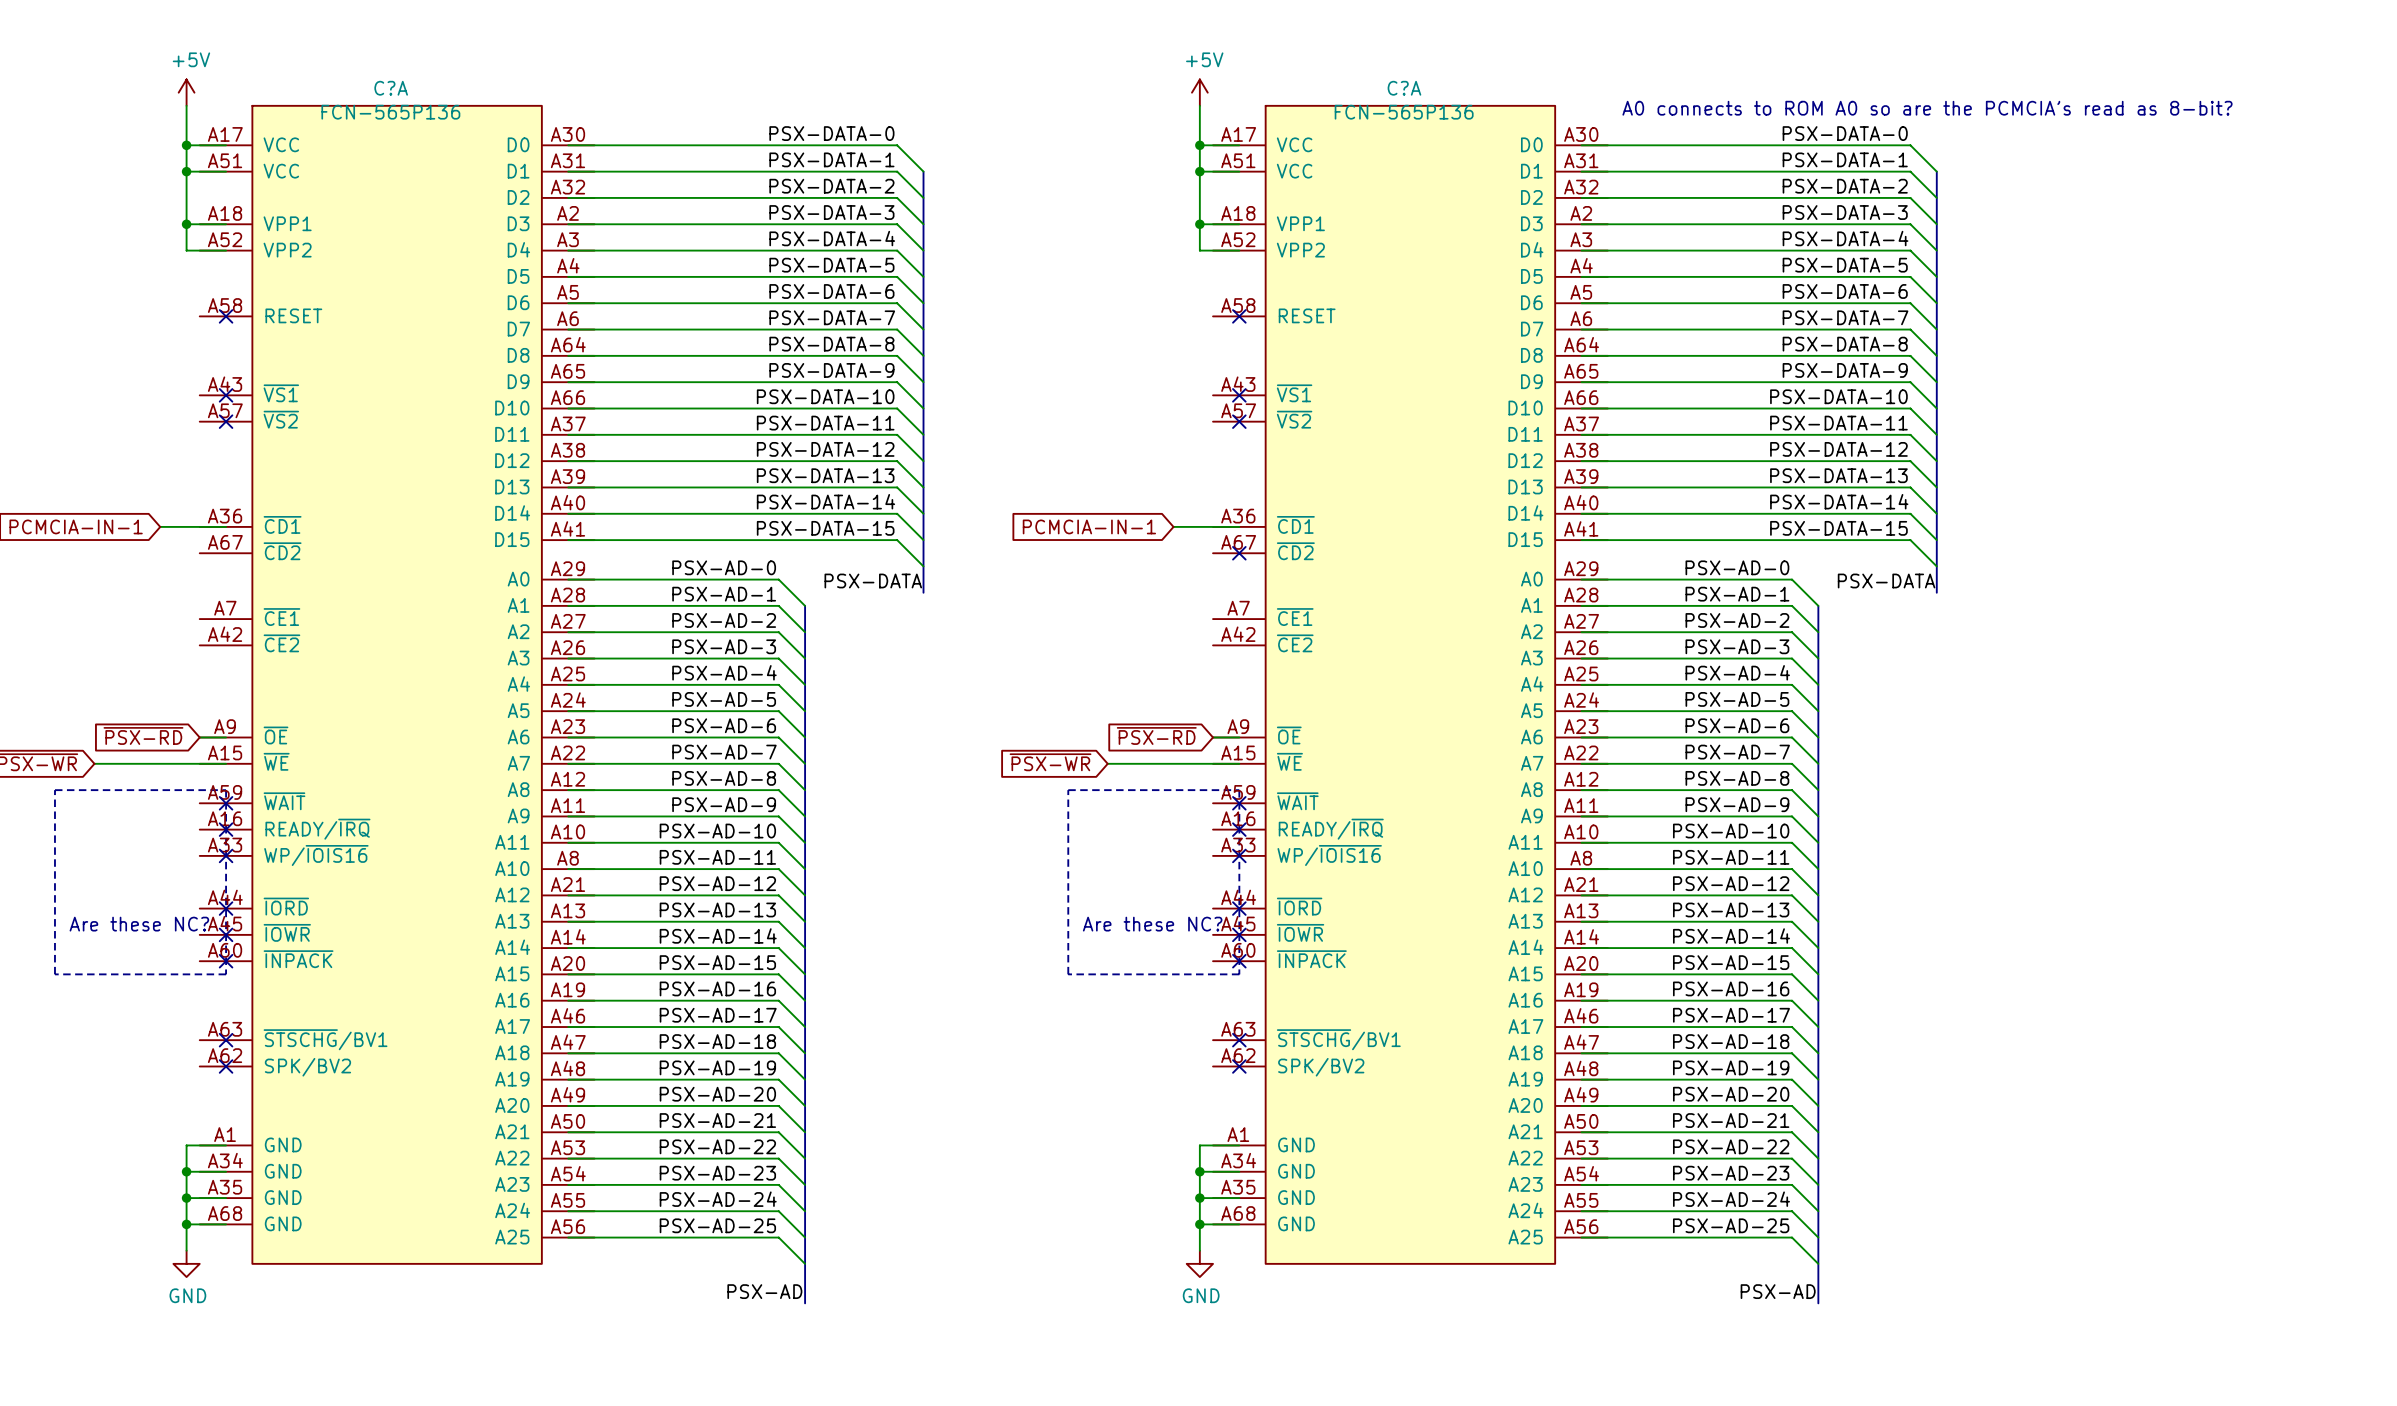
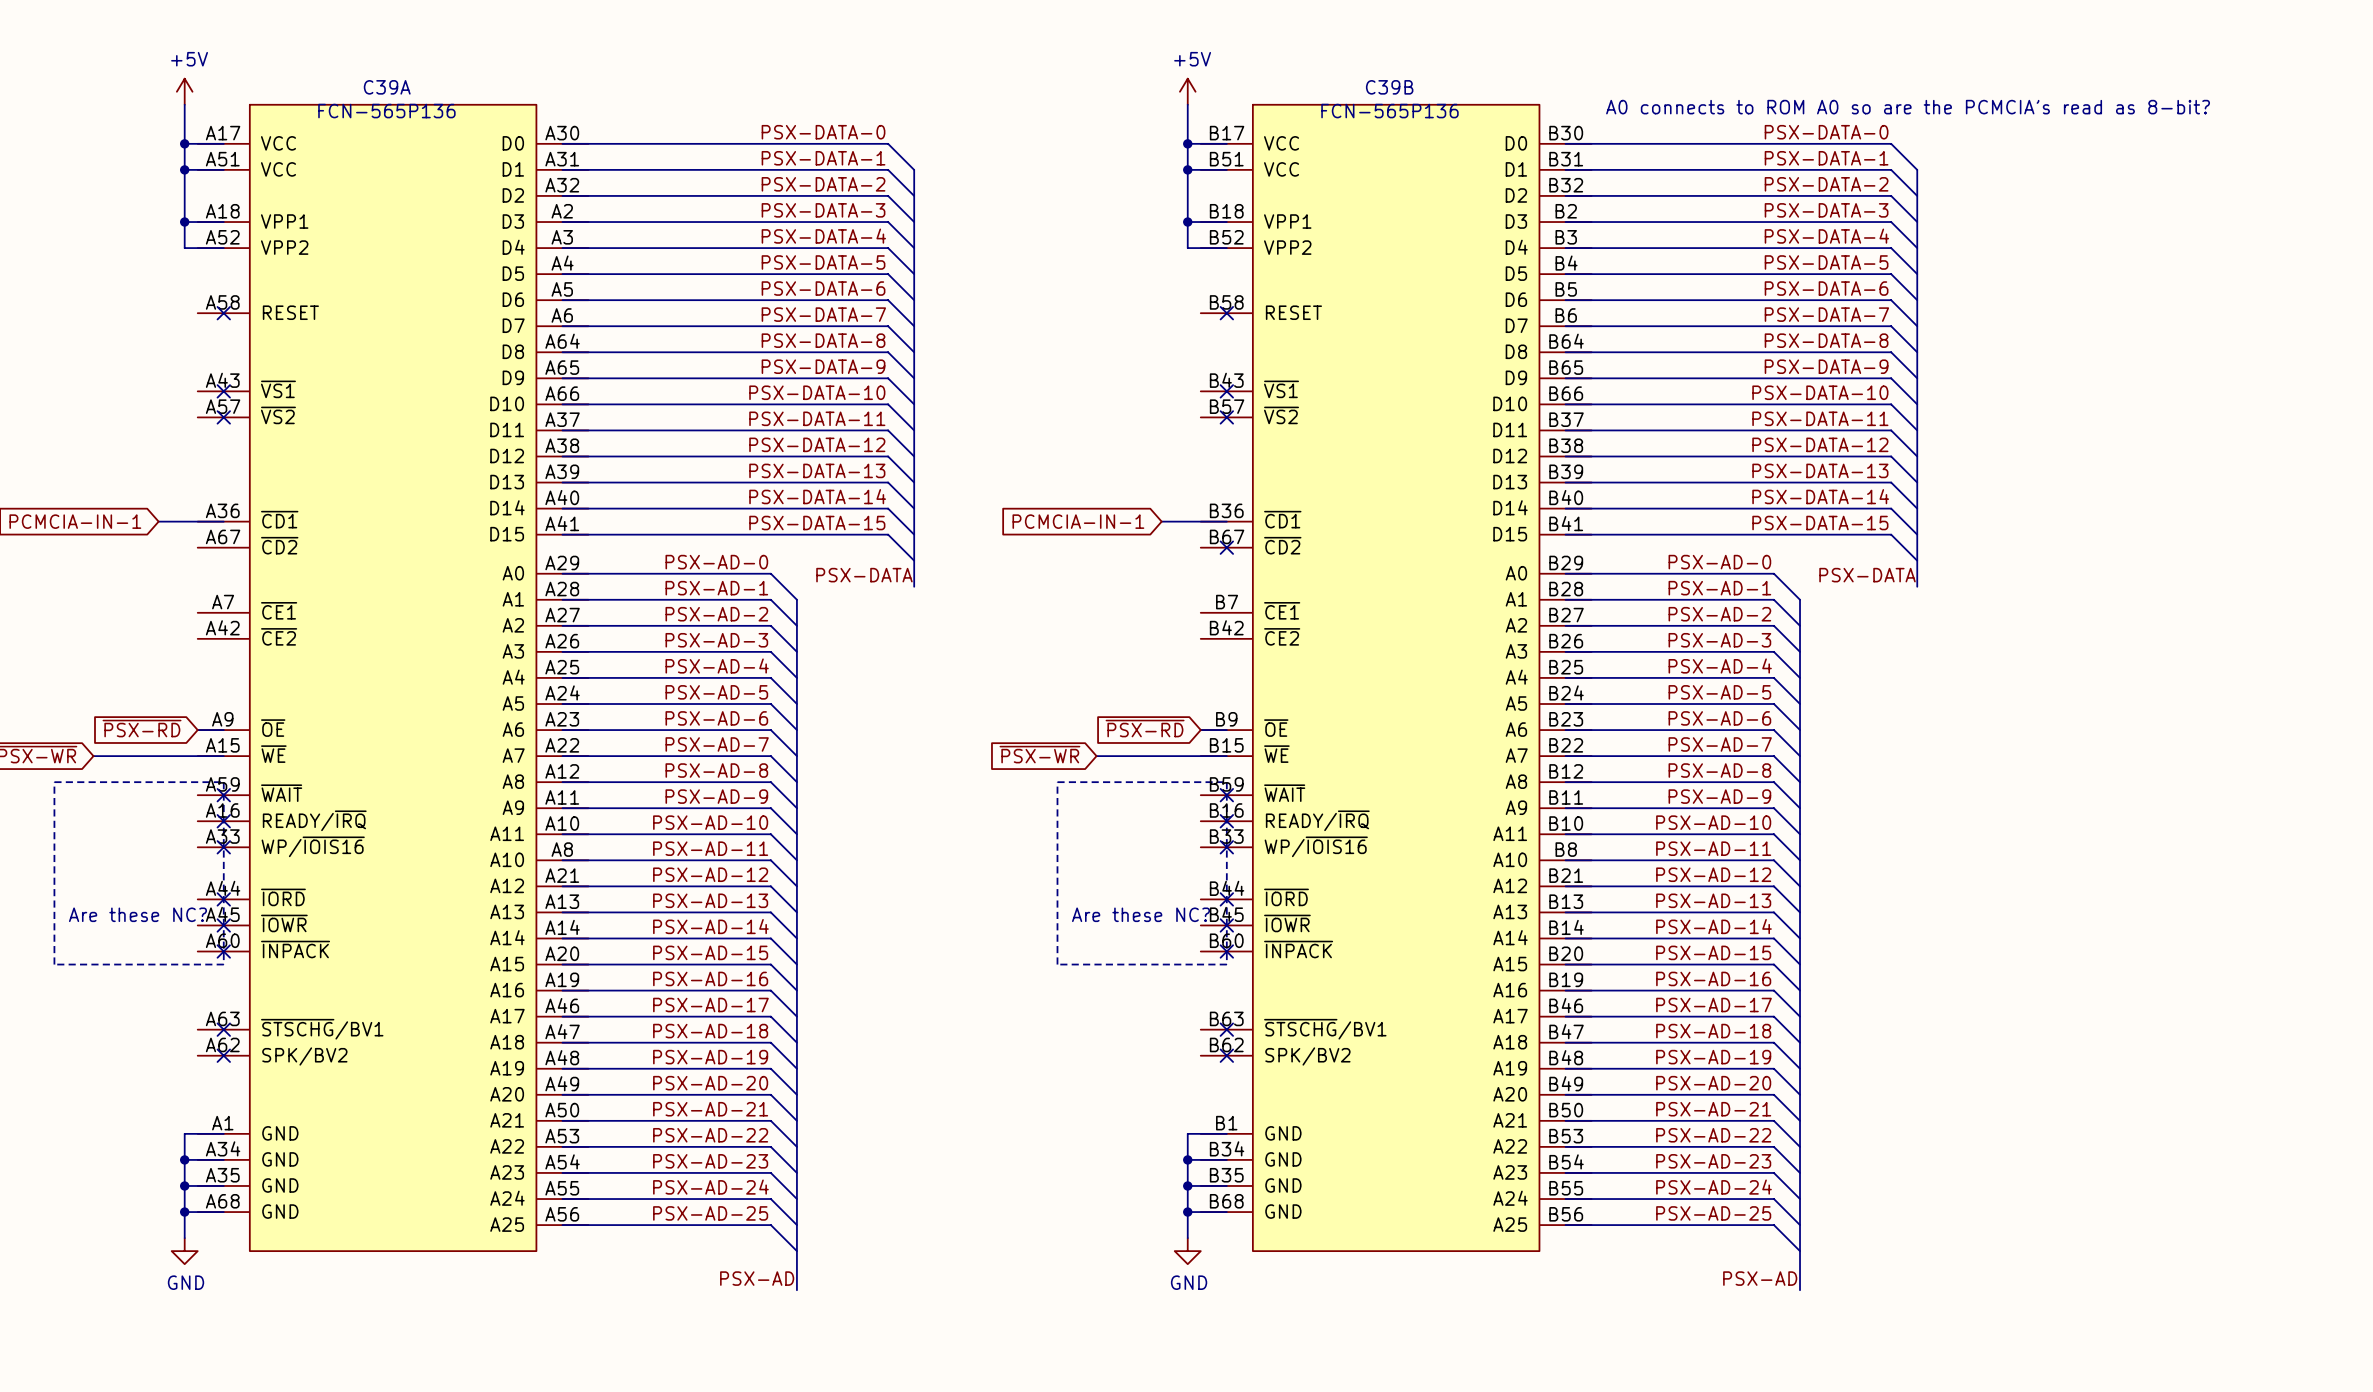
C?A name: C?A (391, 88) -> C39A (387, 87)
C?A name: C?A (1404, 88) -> C39B (1389, 87)
C?A symbol: [1213, 105, 1608, 1264] -> [1200, 104, 1592, 1252]

